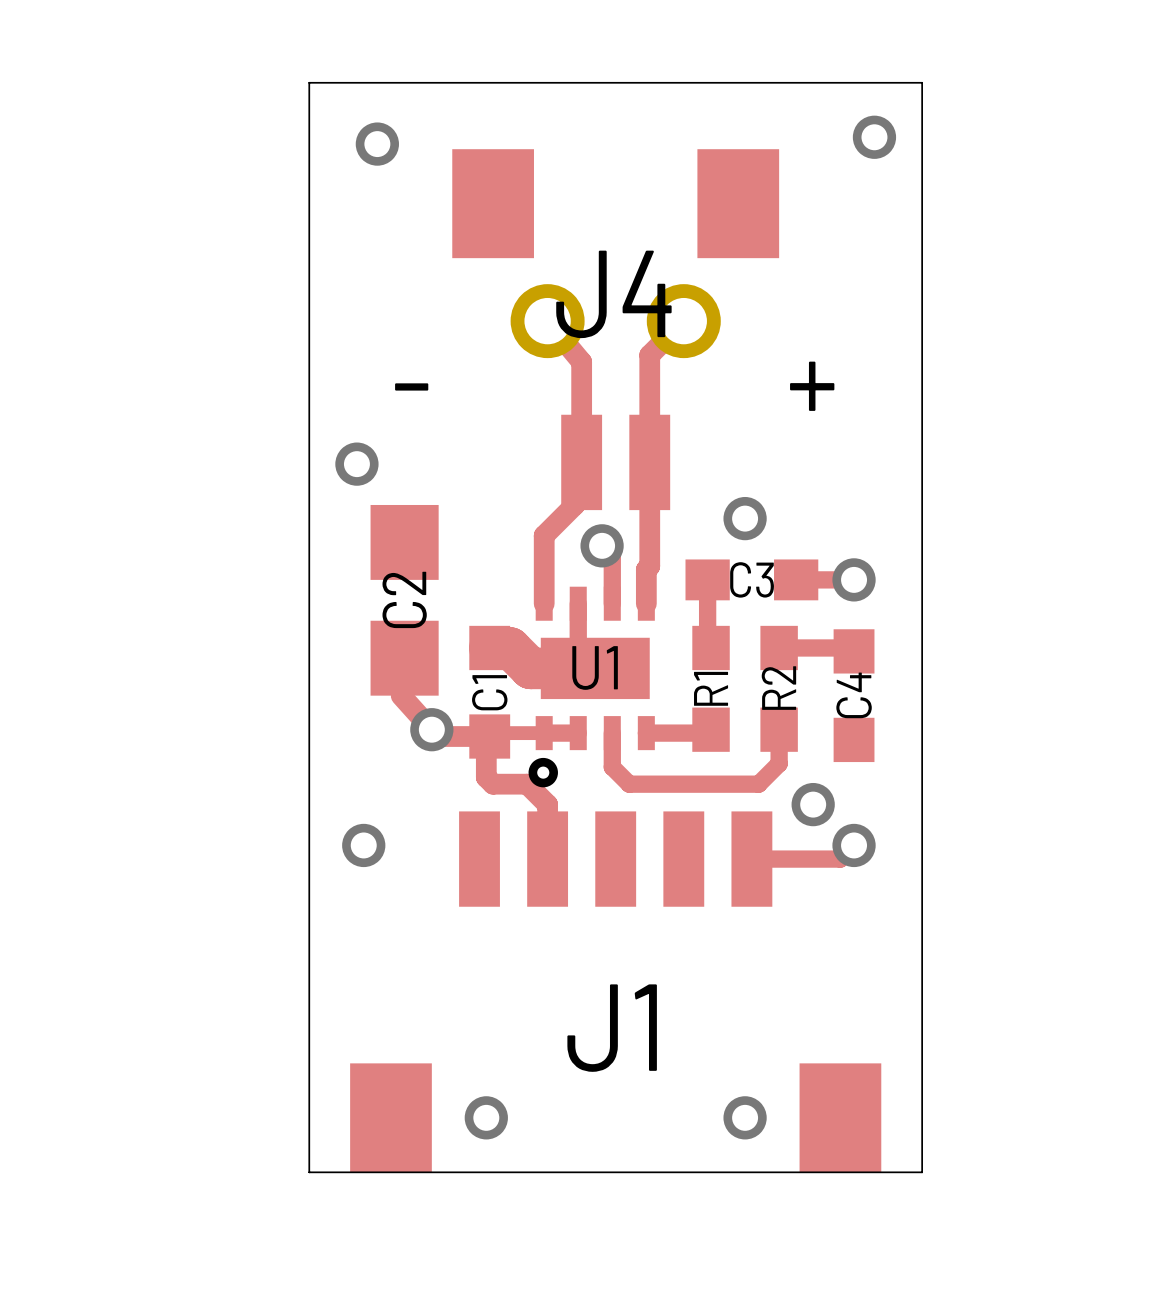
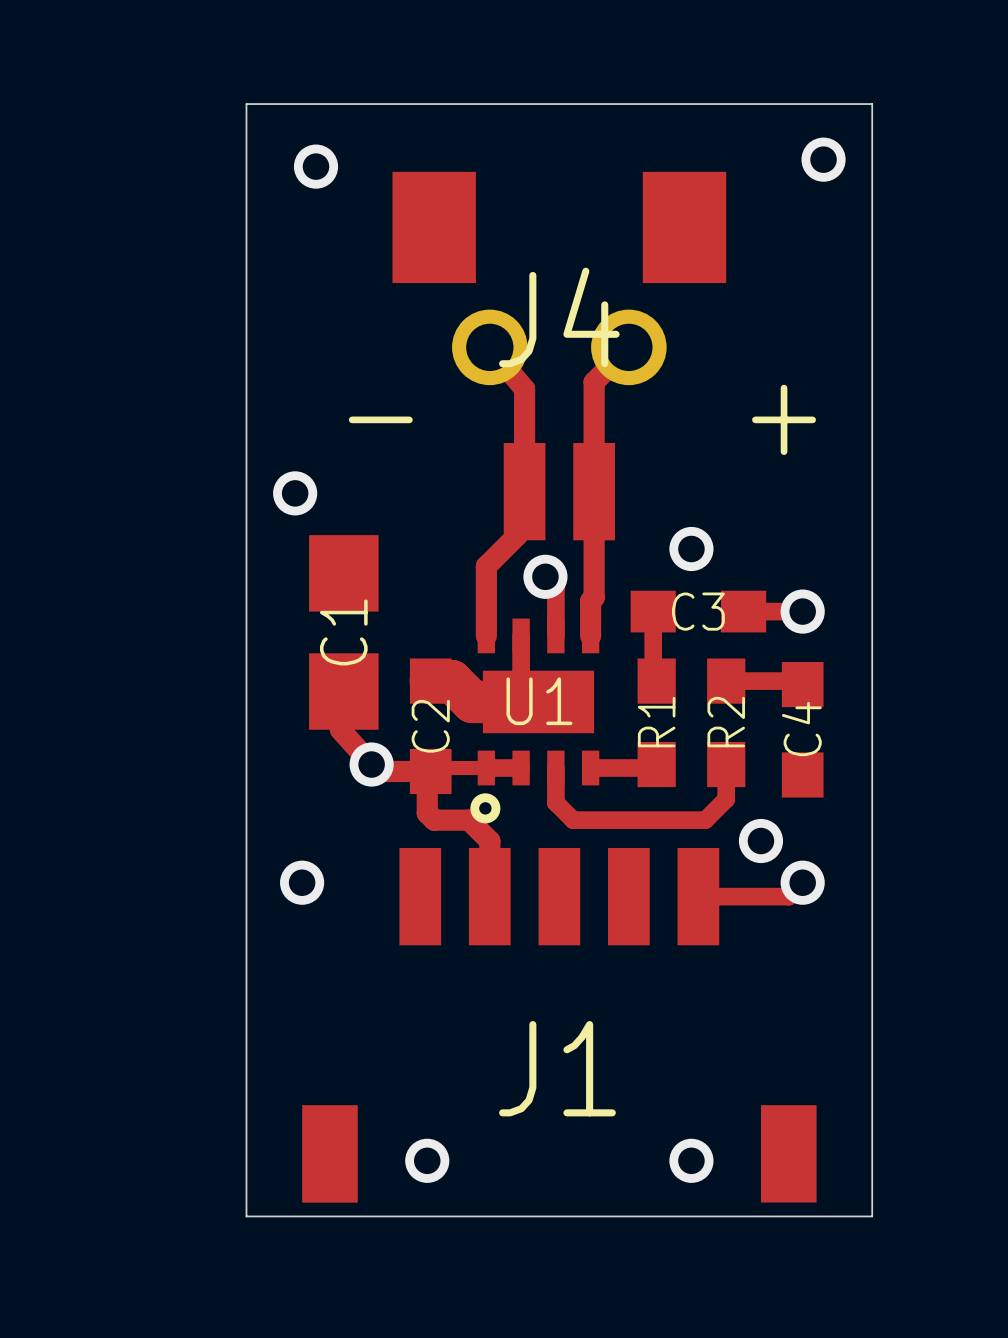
C2 name: C2 (404, 599) -> C1 (343, 632)
C1 name: C1 (489, 692) -> C2 (430, 726)
J1 footprint: [350, 811, 882, 1173] -> [302, 847, 817, 1203]

